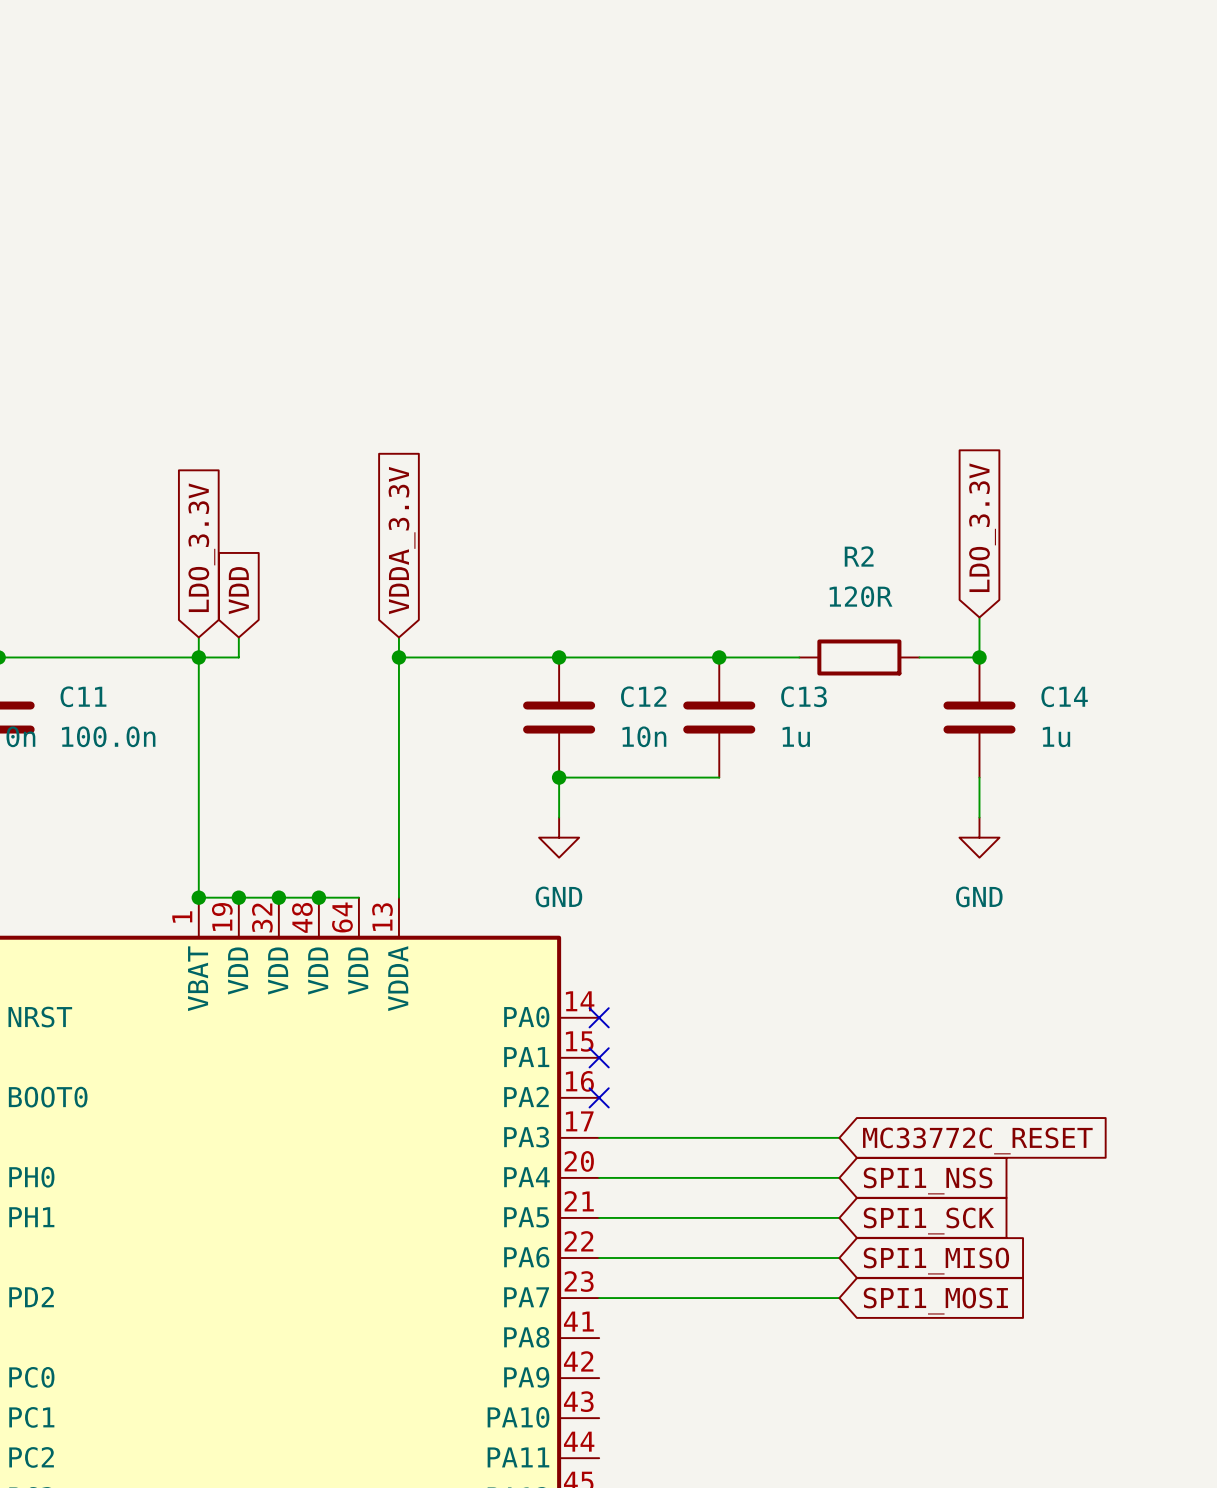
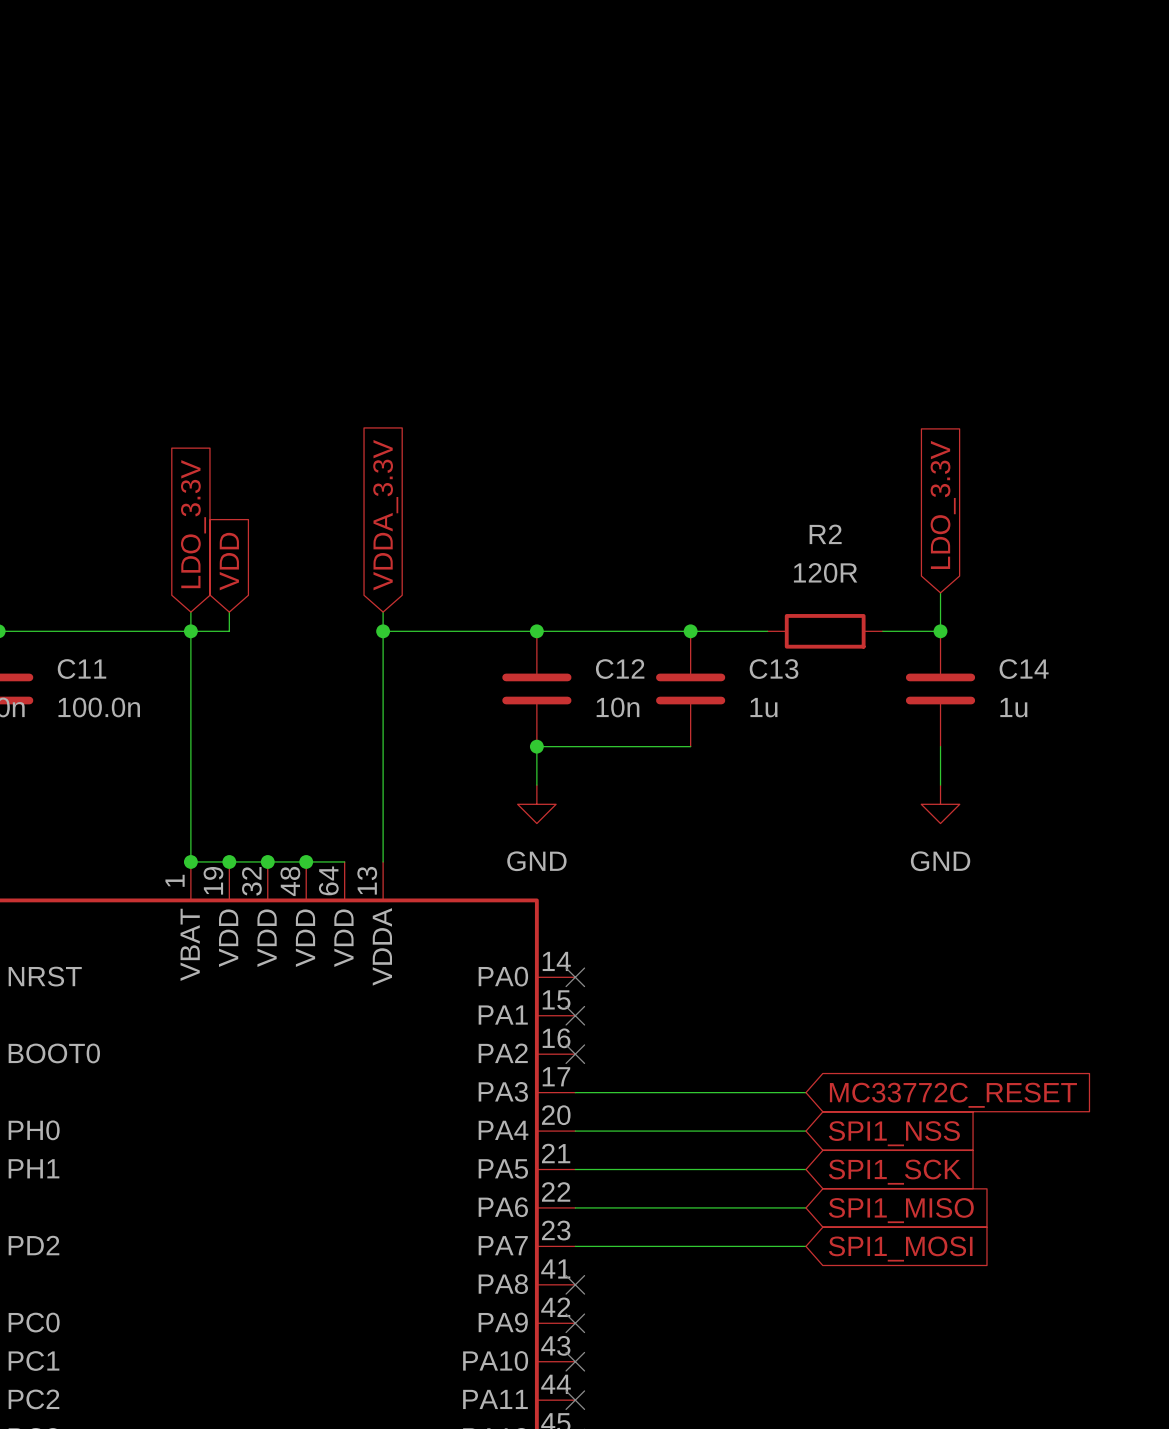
no-connect mark: none -> (575, 1284)
no-connect mark: none -> (575, 1323)
no-connect mark: none -> (575, 1361)
no-connect mark: none -> (575, 1400)

